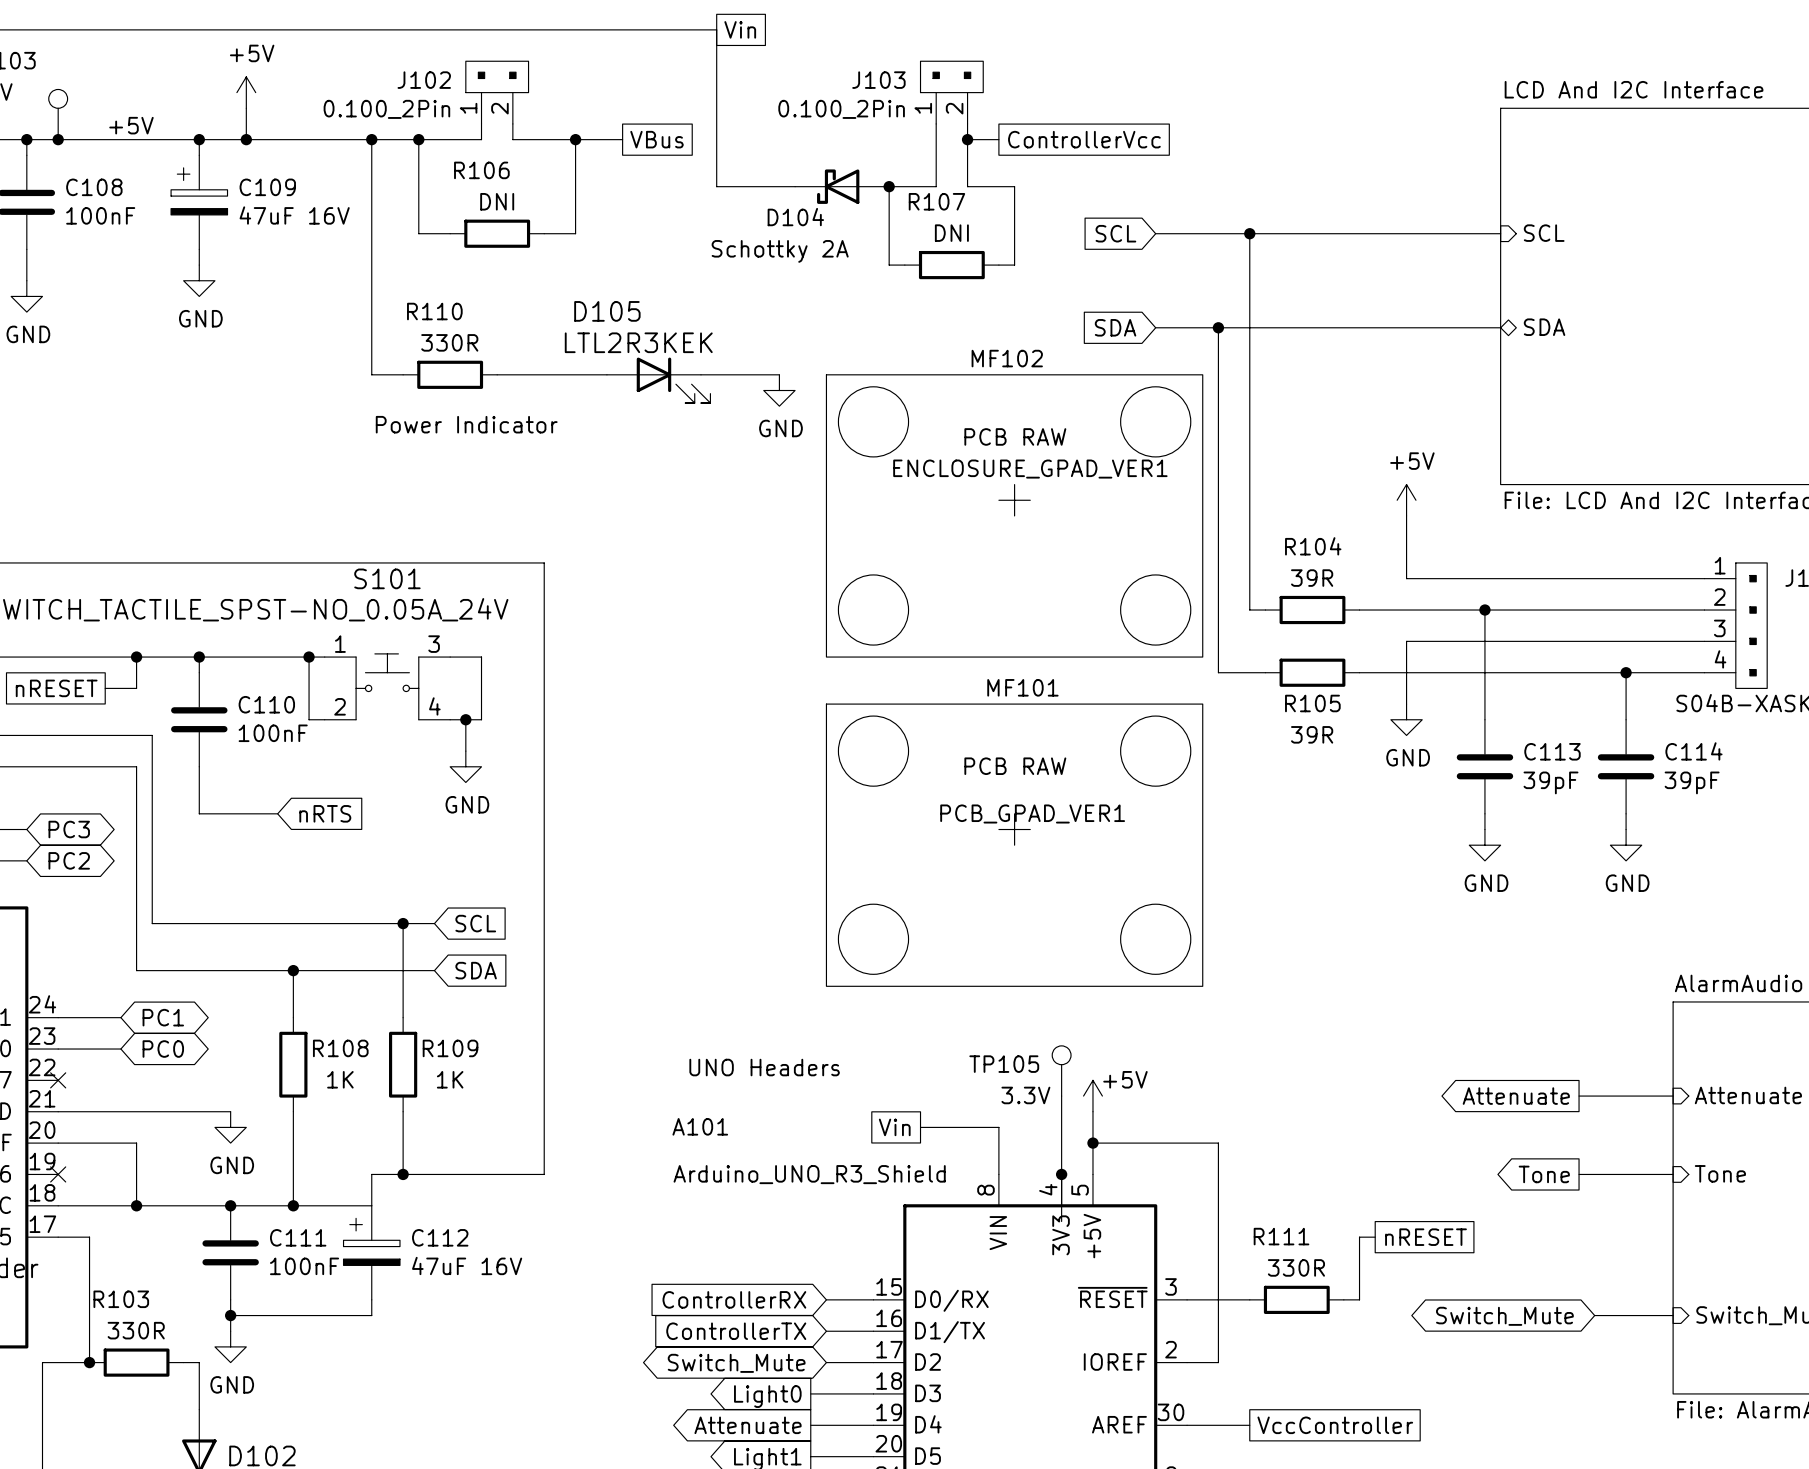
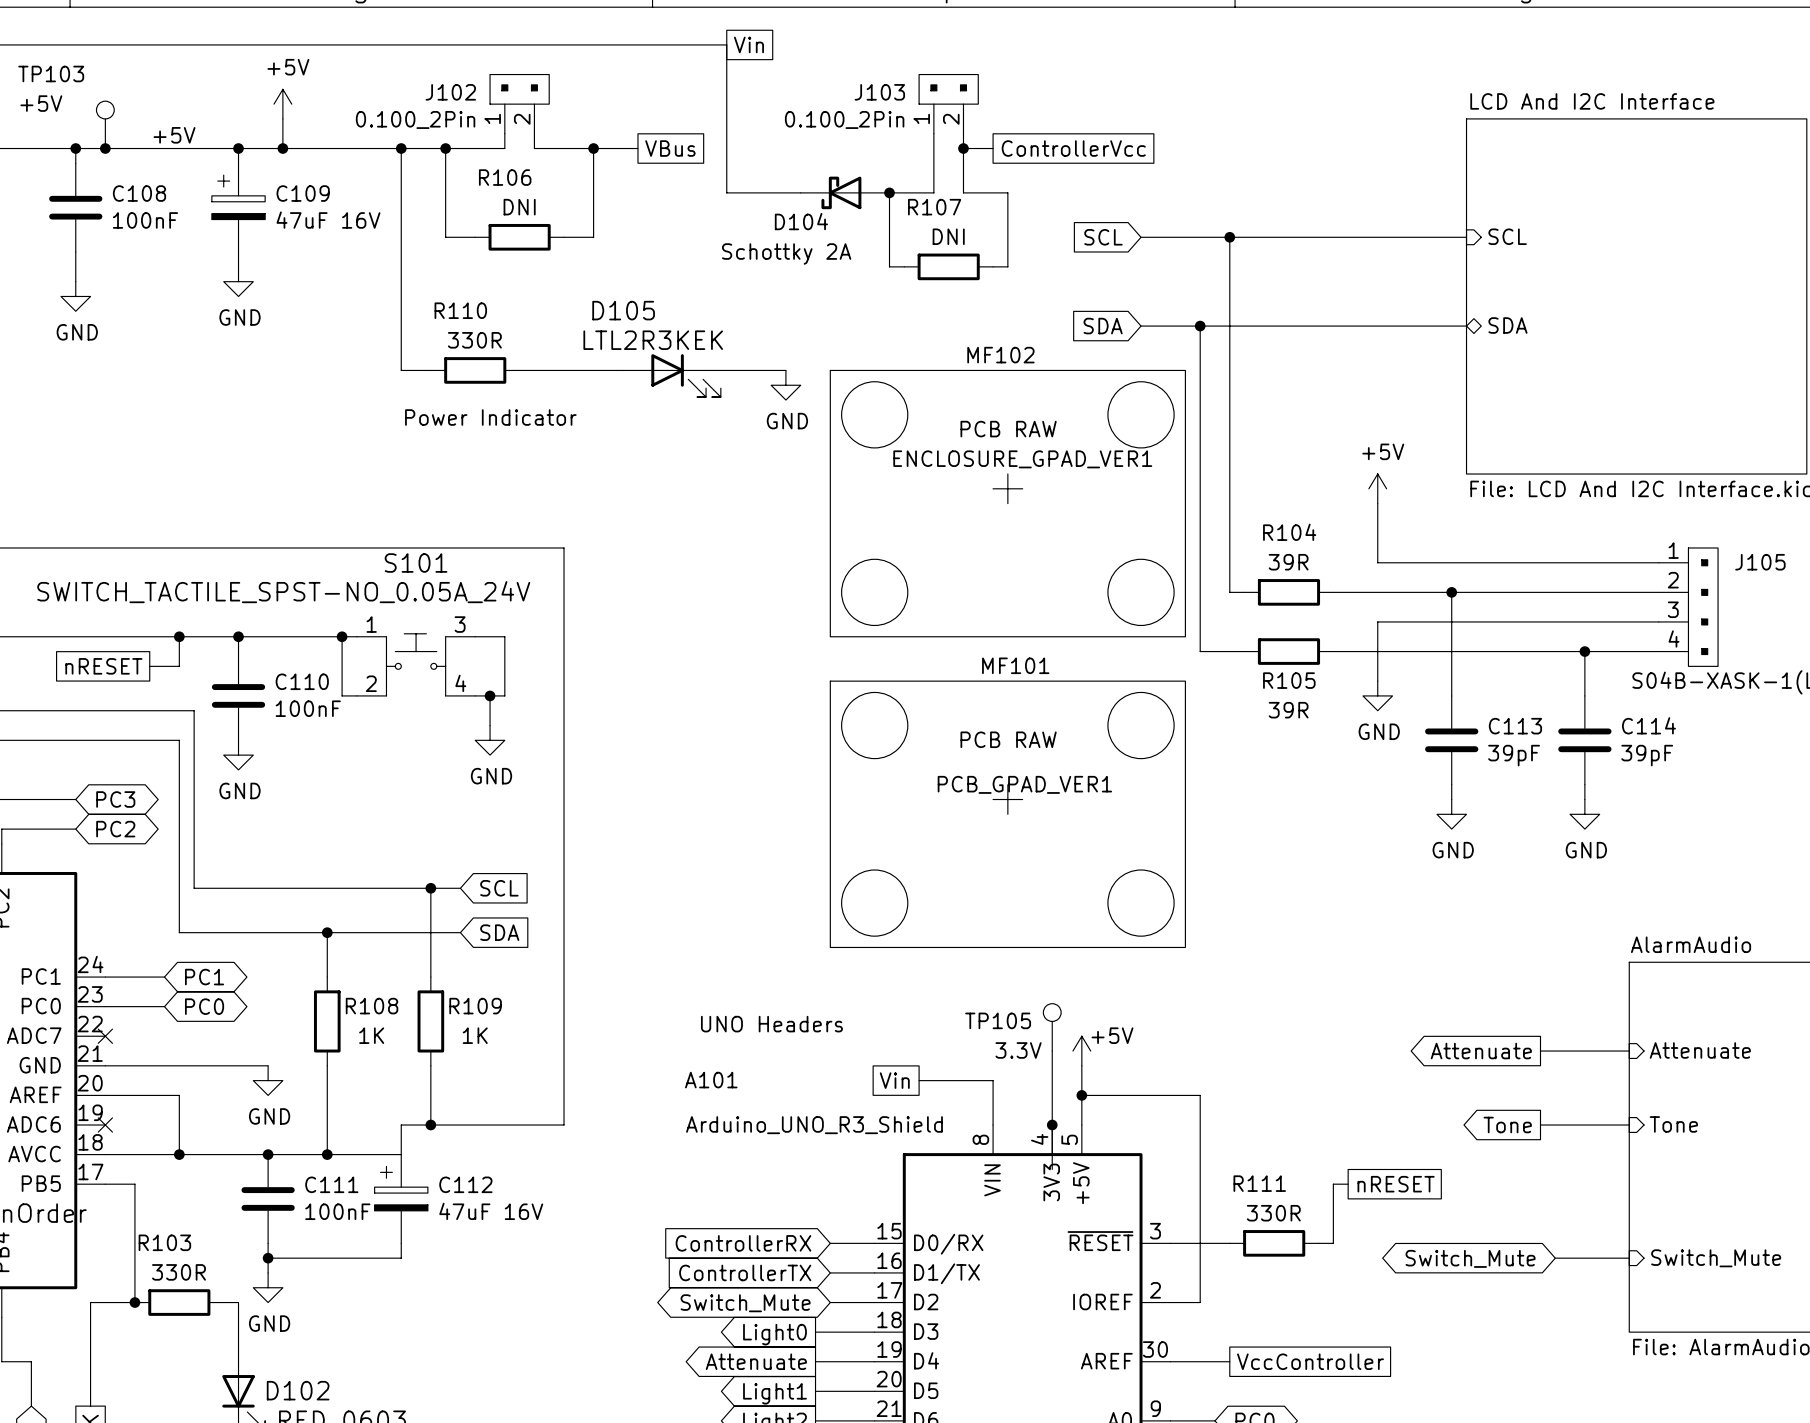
wire: (199, 766) (199, 813) (277, 813) -> none
power symbol: none -> GND (238, 755)
global label: nRTS (325, 813) -> none

